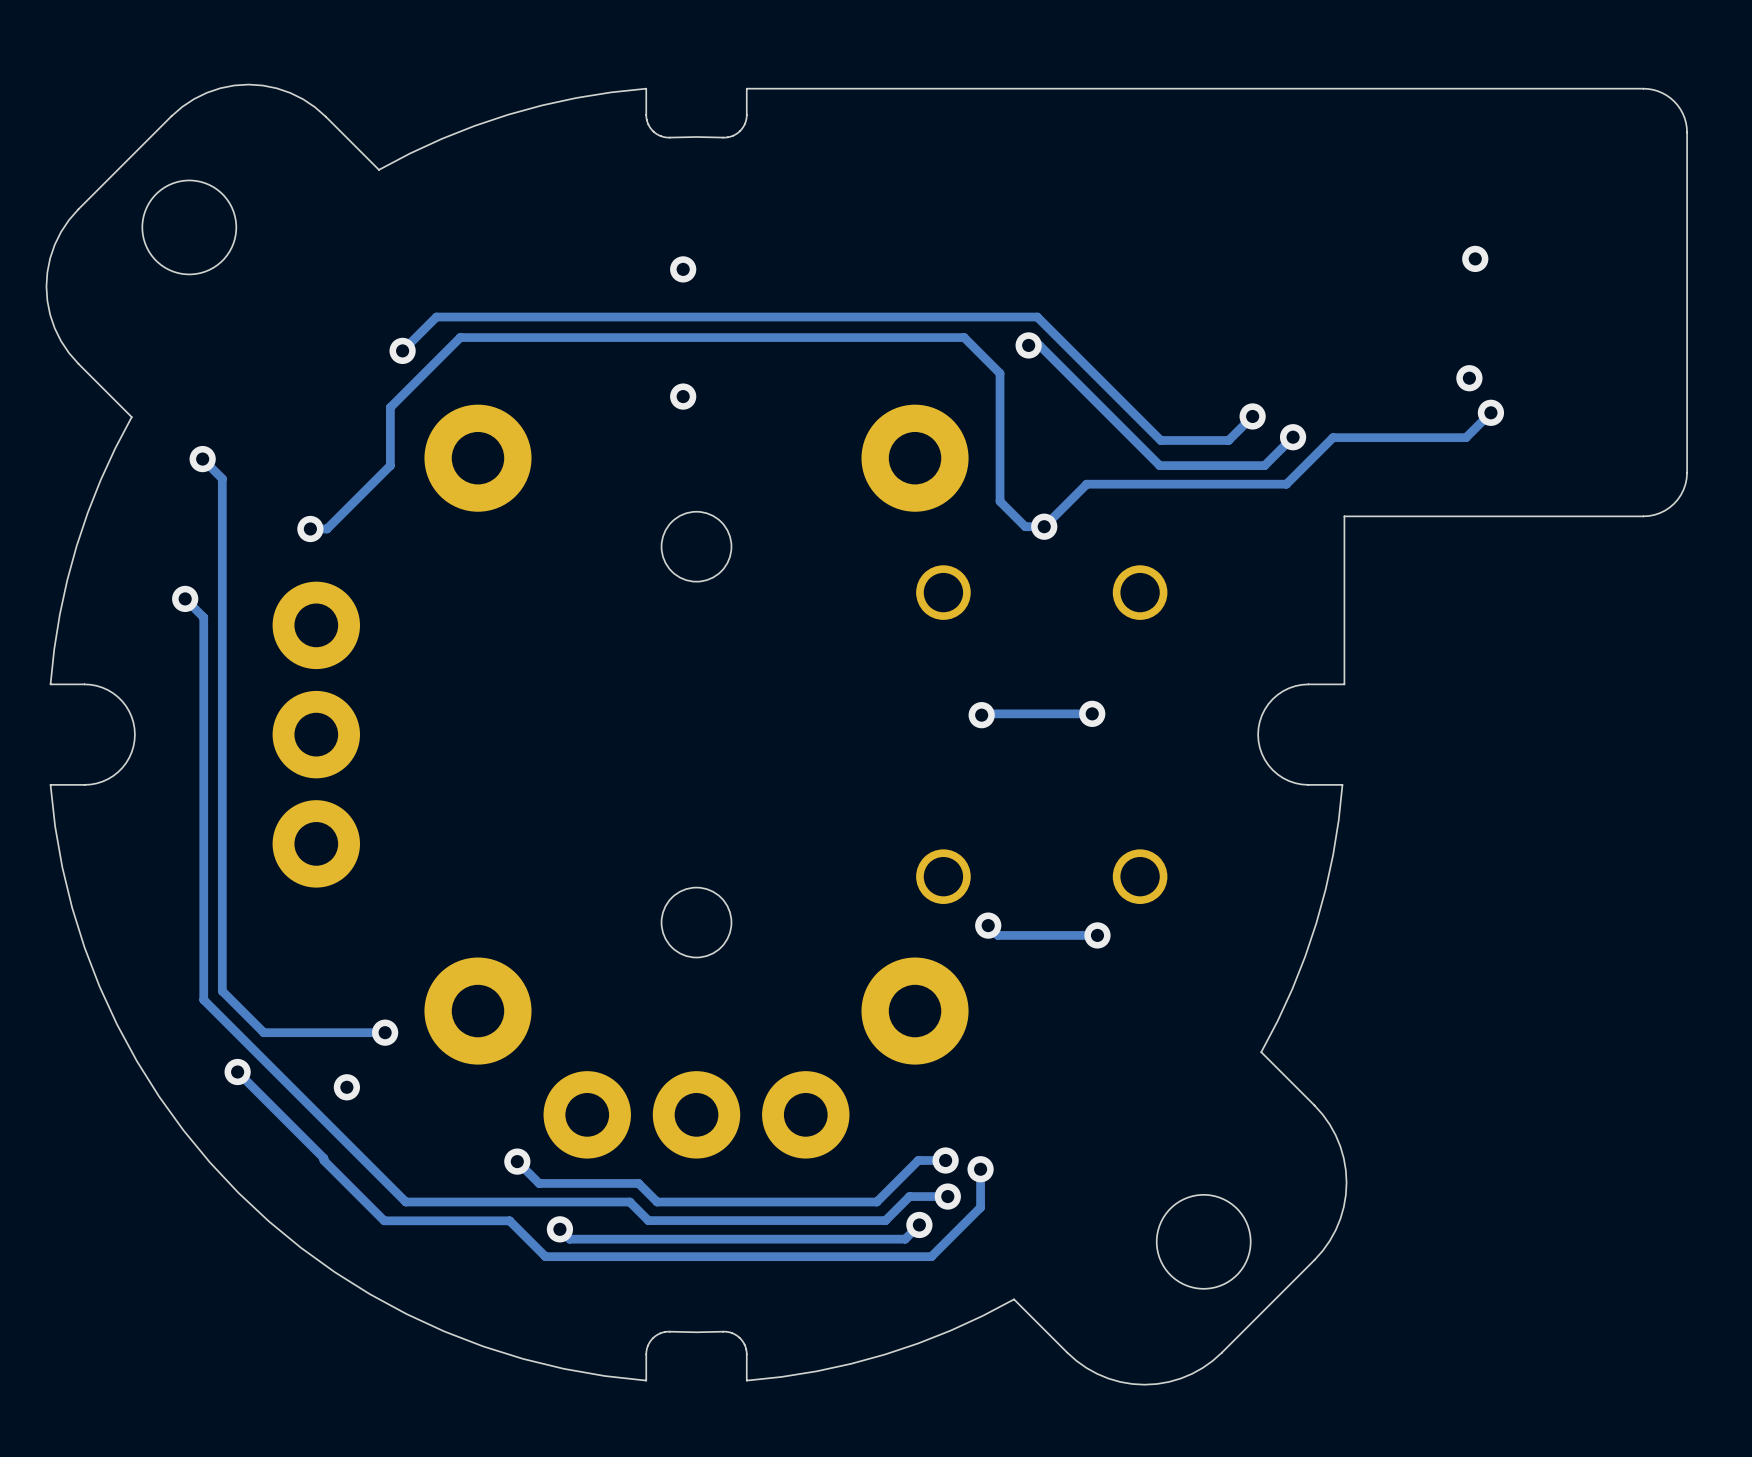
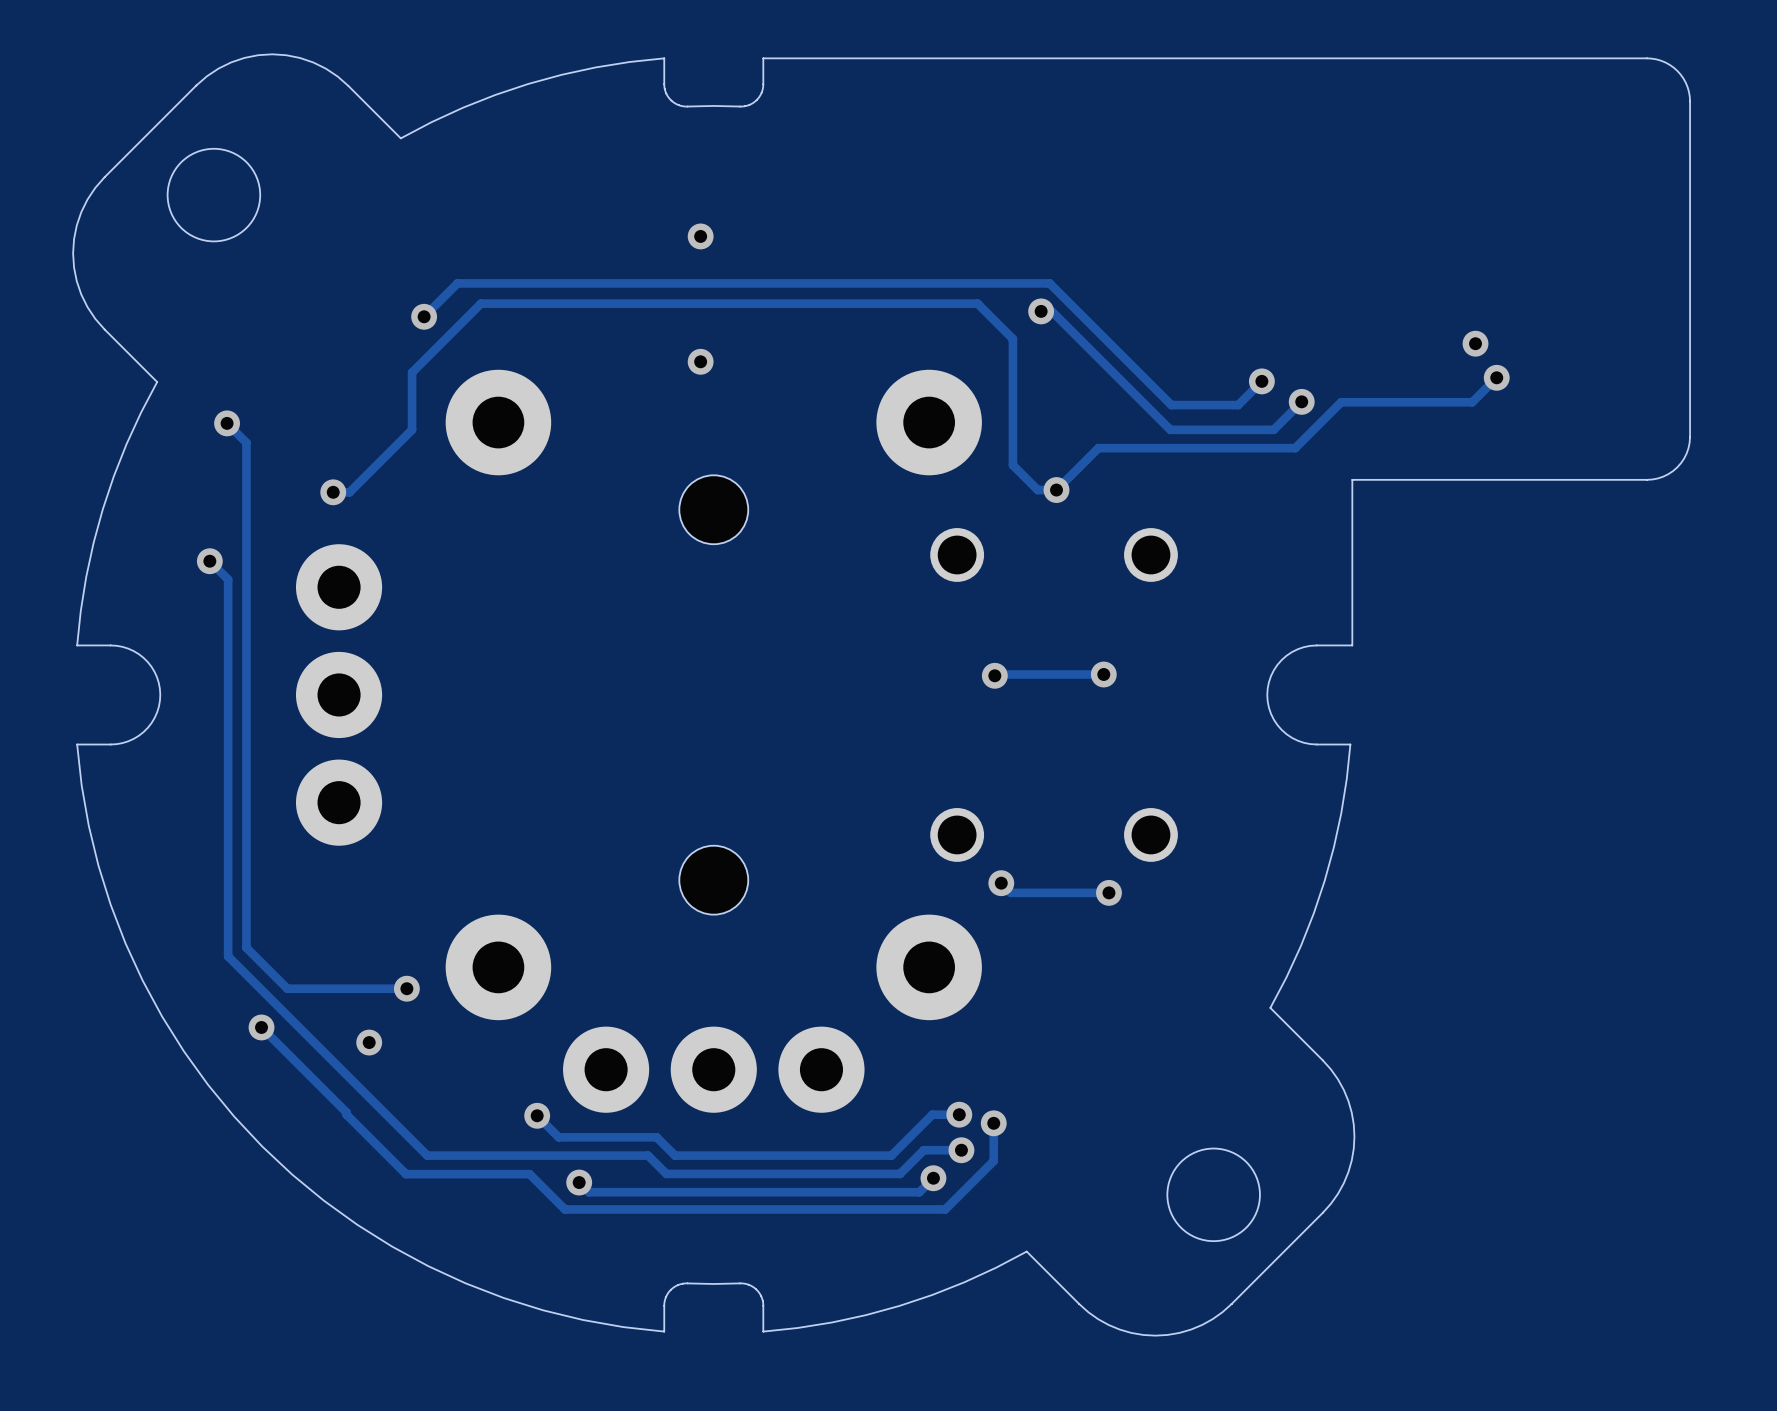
via: (1475, 258) -> none

